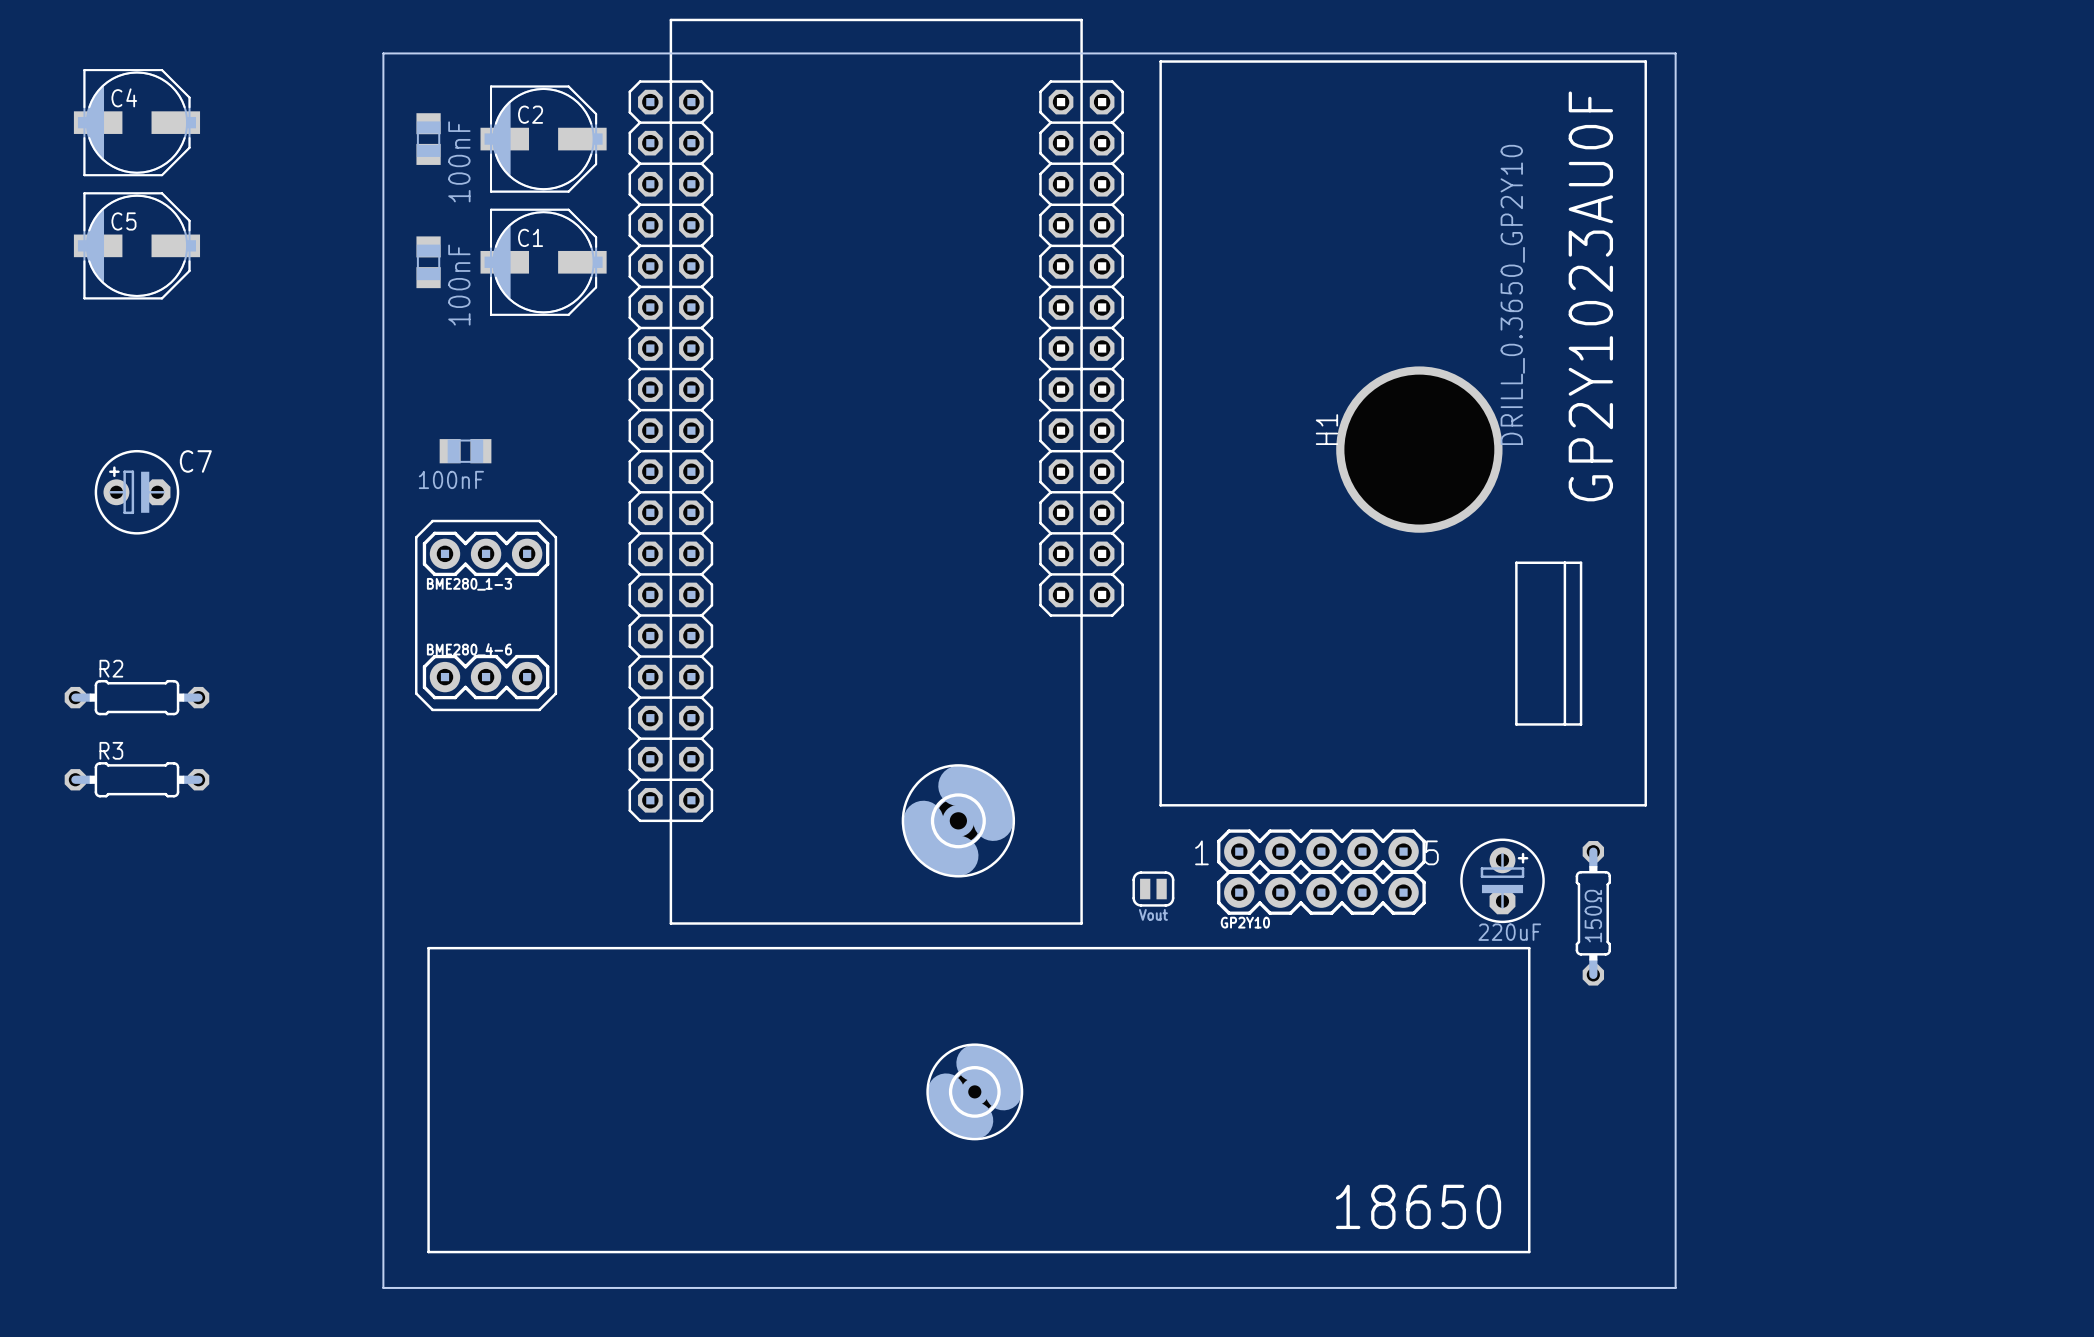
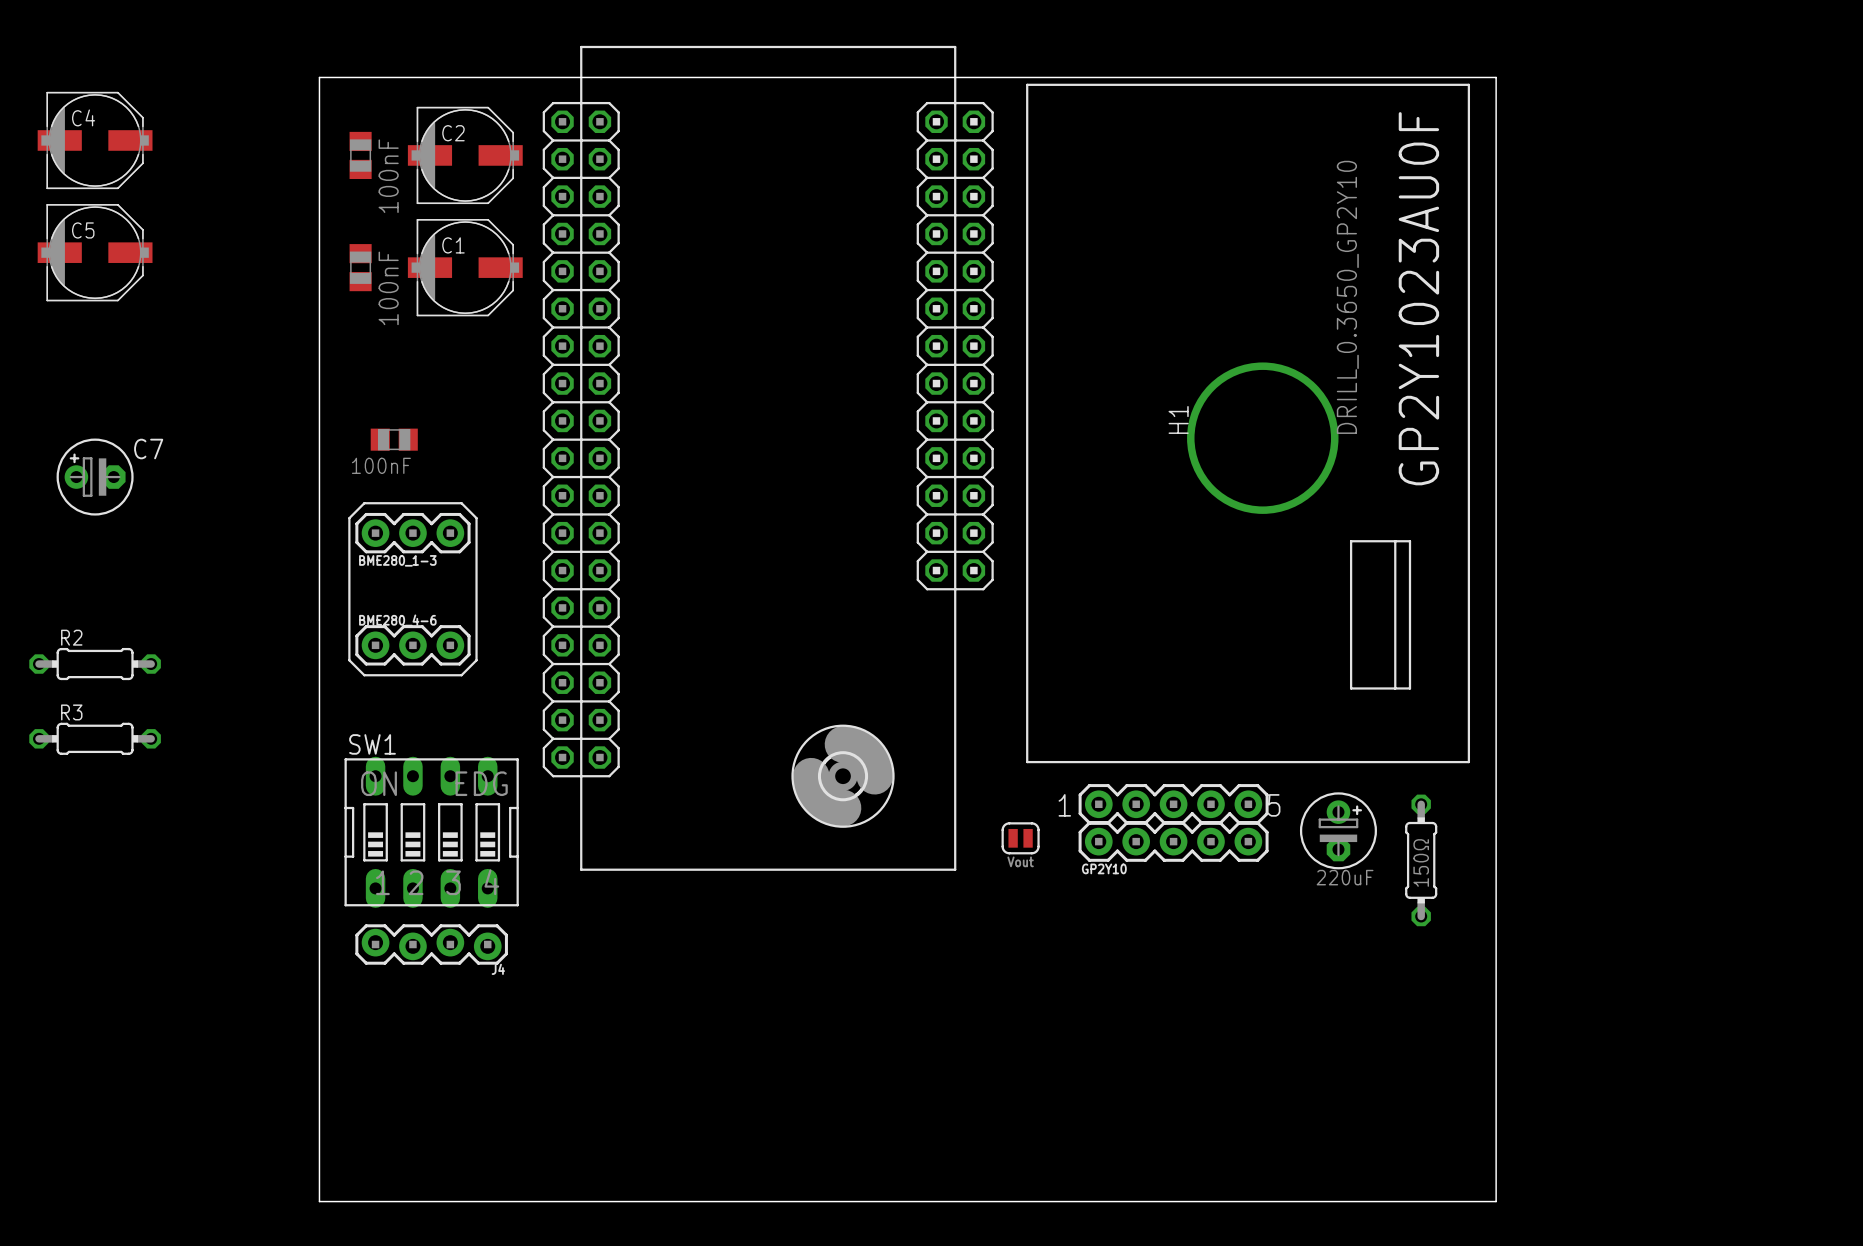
SW1: none -> (431, 832)
line: (428, 948) (428, 1252) (1529, 1252) (1529, 948) (428, 948) -> none
J4: none -> (431, 944)
part: (974, 1091) -> none
text: 18650 (1418, 1206) -> none

